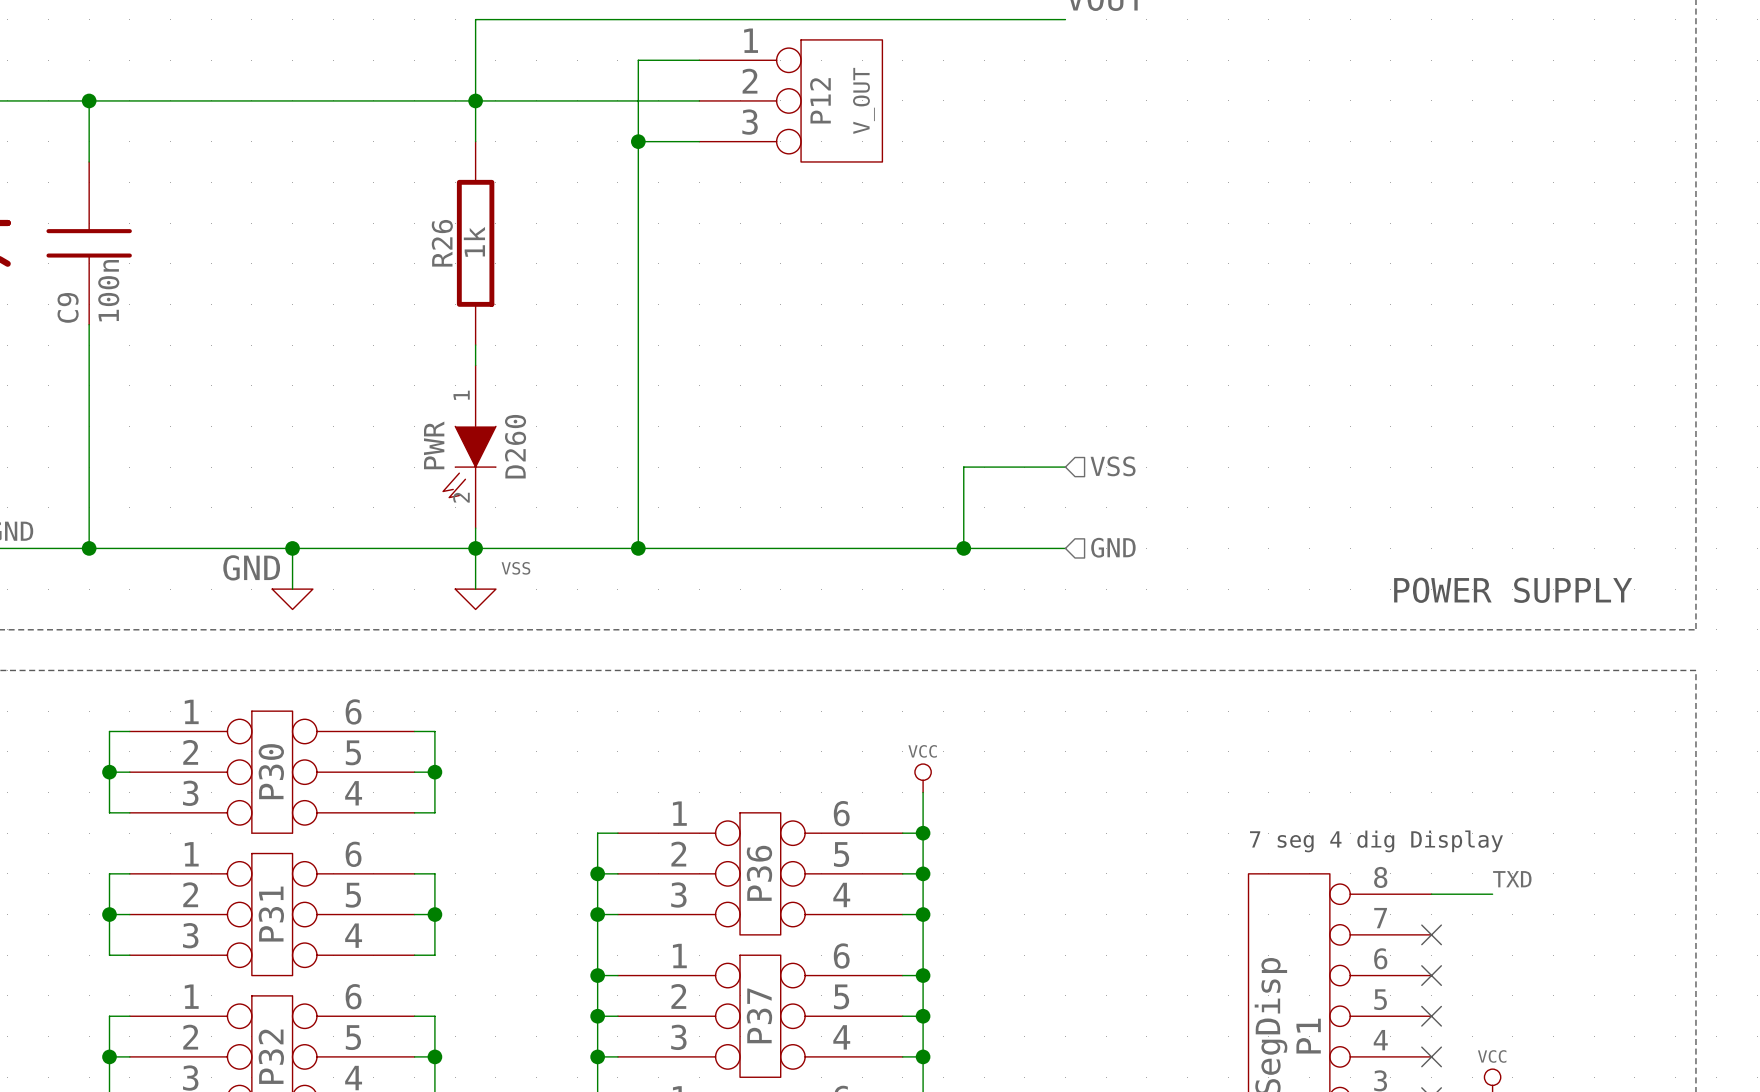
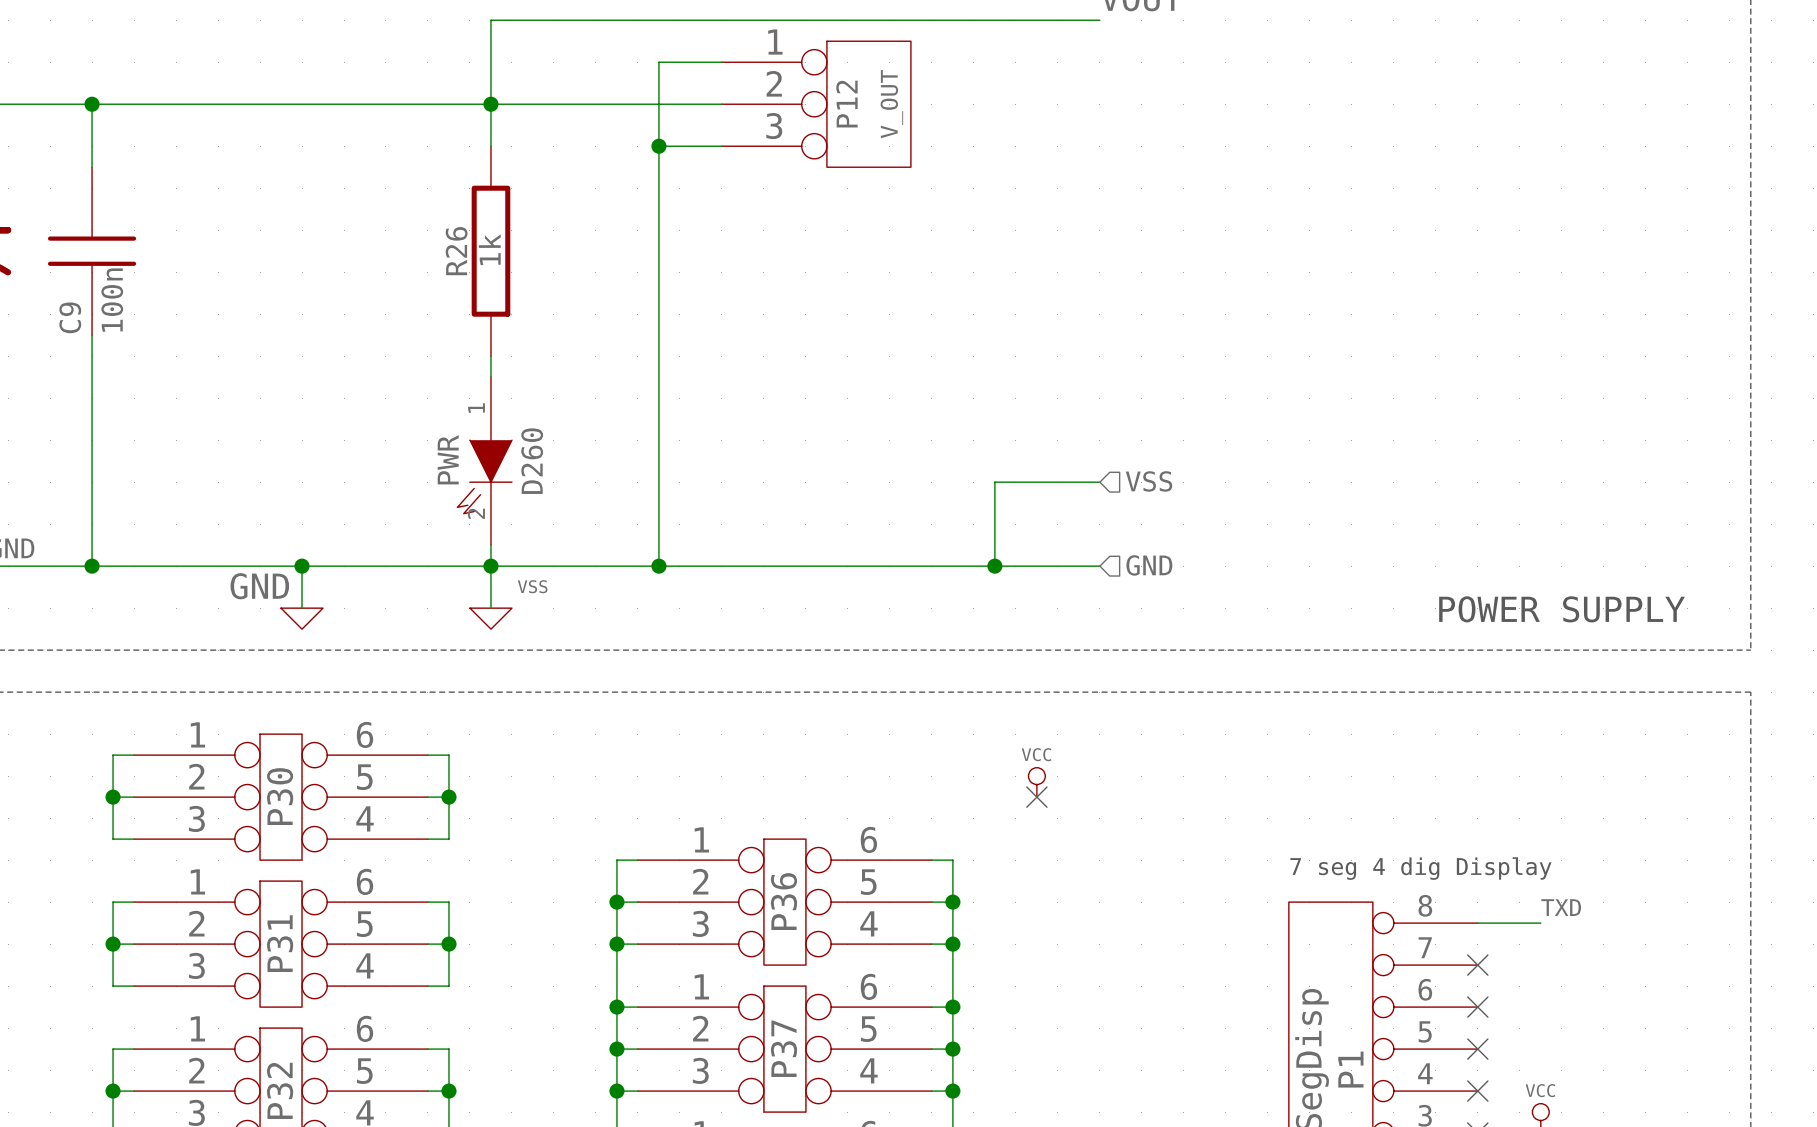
no-connect mark: none -> (1036, 797)
power symbol position: VCC (923, 778) -> VCC (1036, 782)
wire: (923, 792) (923, 833) -> none
junction: (923, 833) -> none

